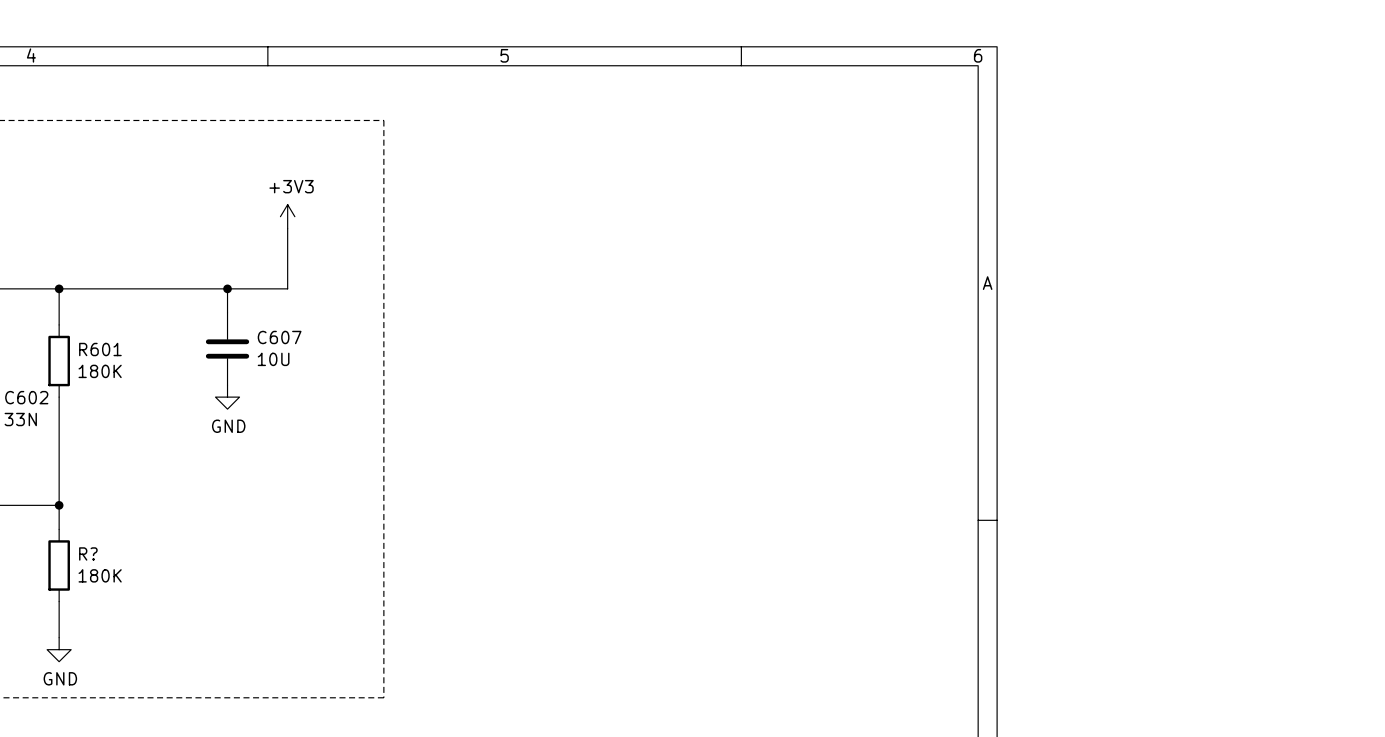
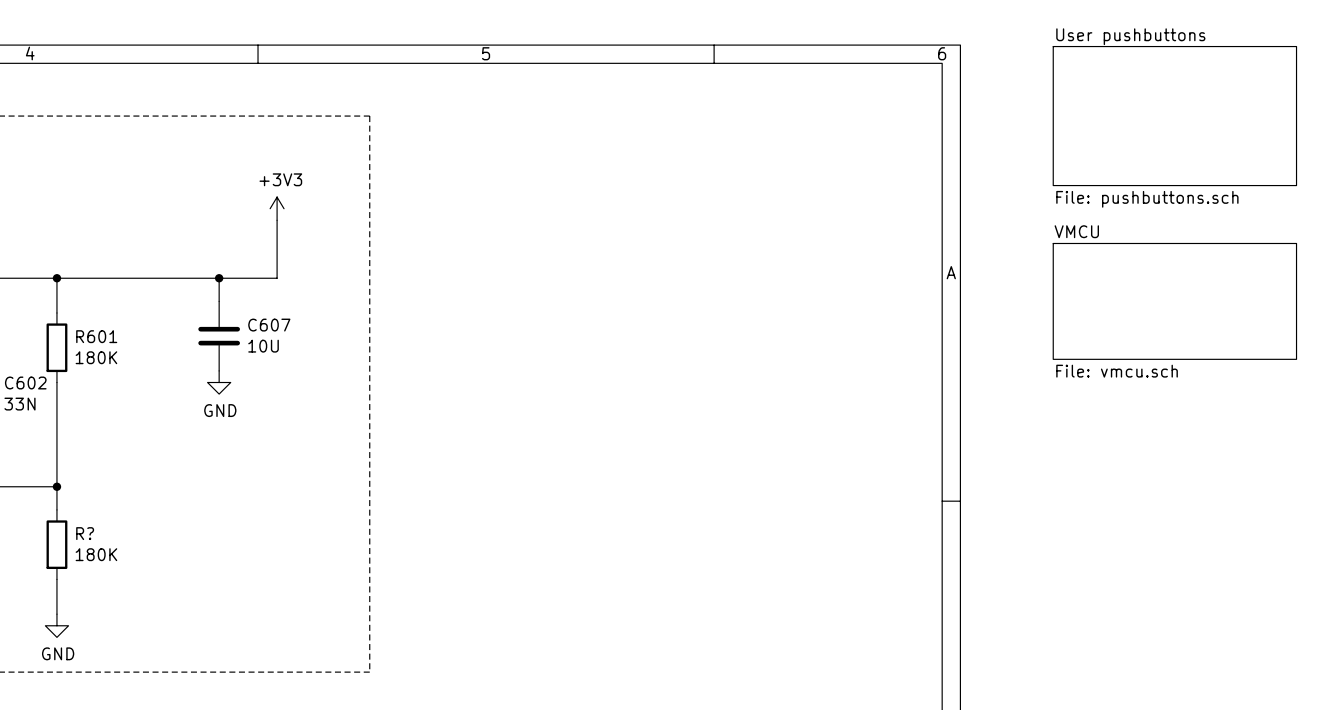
sheet User pushbuttons: none -> File: pushbuttons.sch (1174, 116)
sheet VMCU: none -> File: vmcu.sch (1174, 301)

